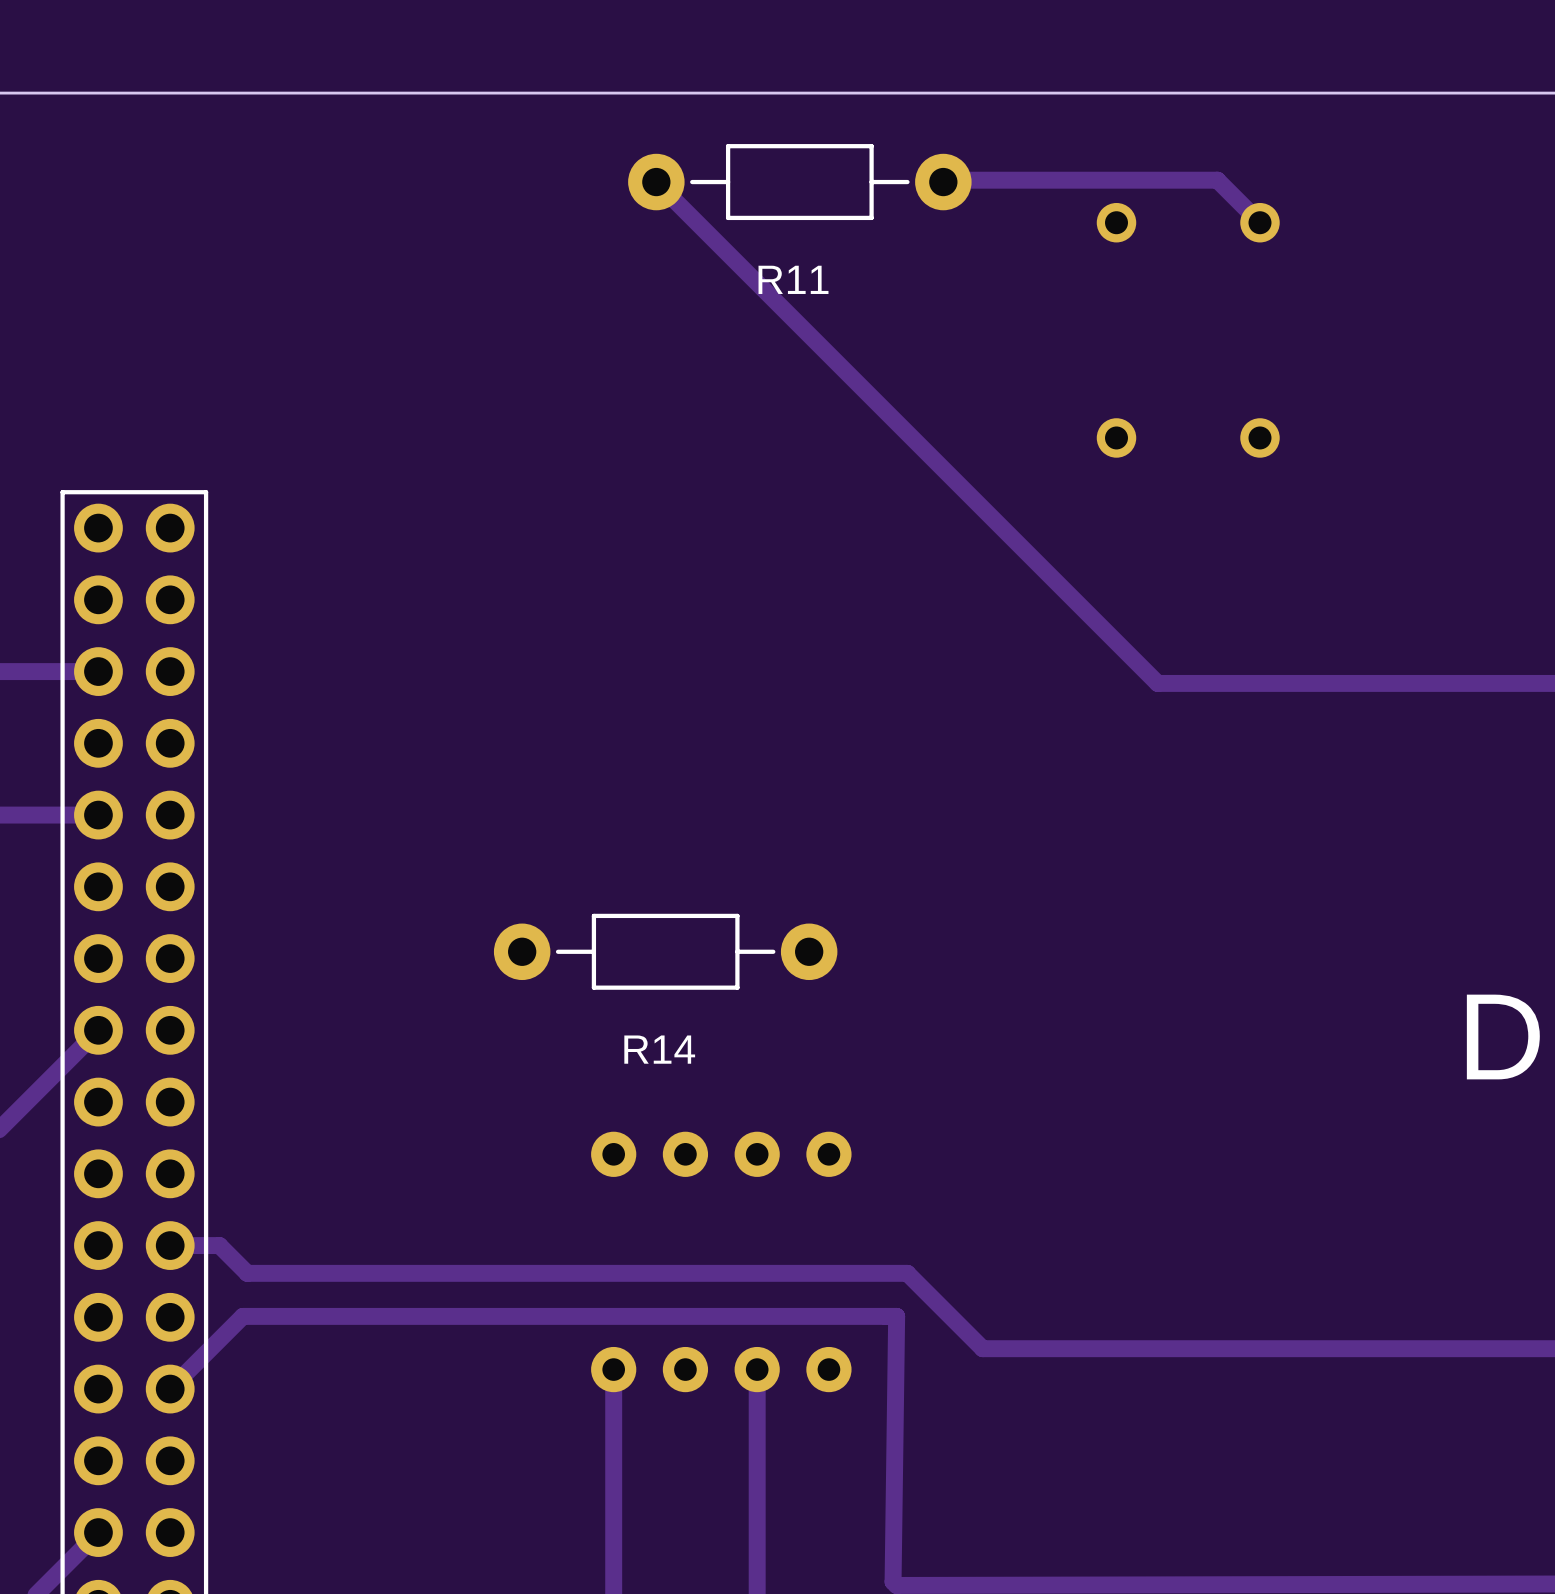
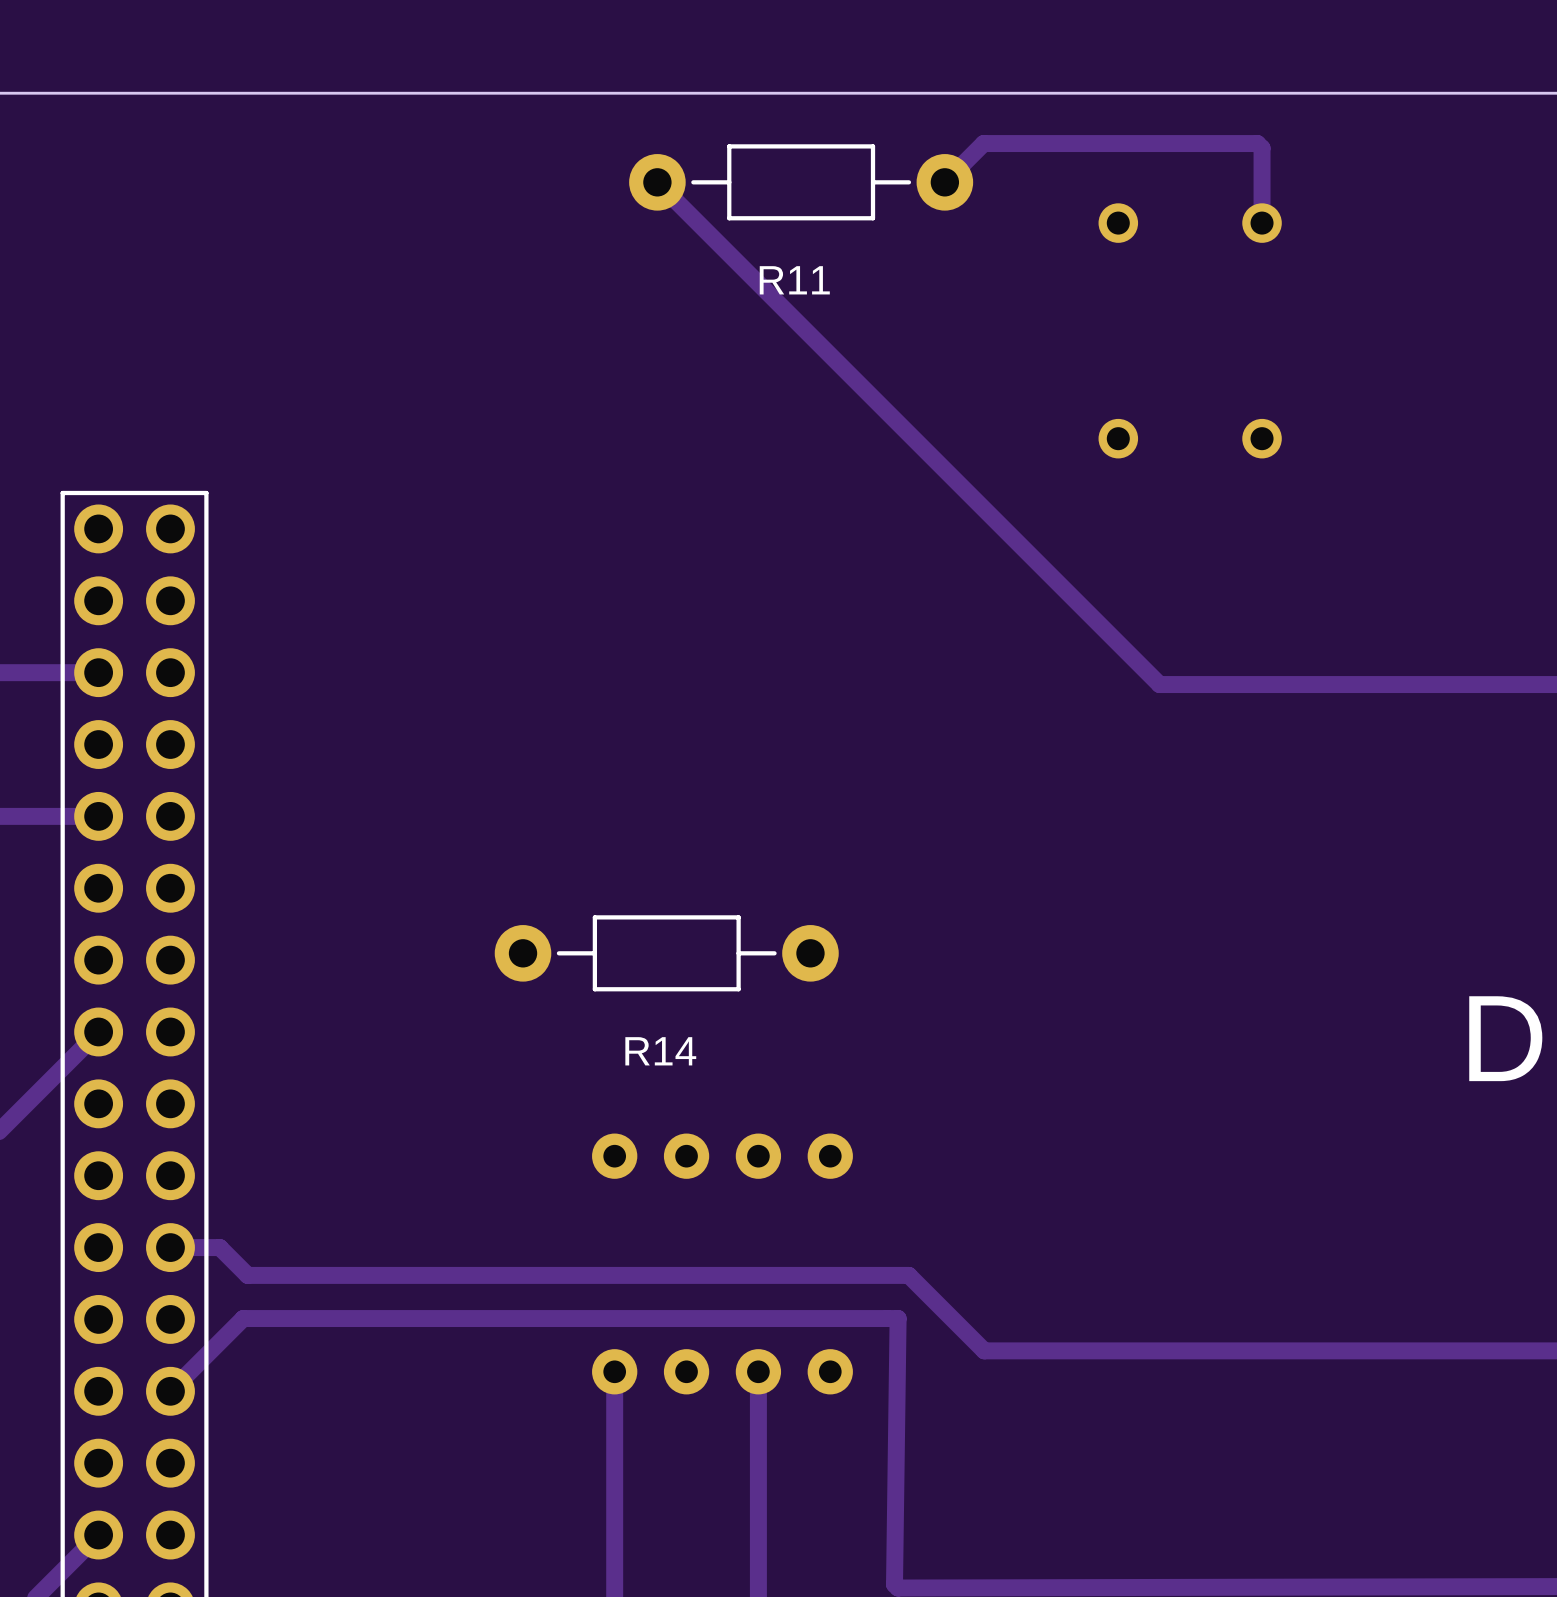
track: (945, 180) (1217, 180) (1259, 222) -> (946, 180) (983, 143) (1257, 143) (1262, 148) (1262, 223)

